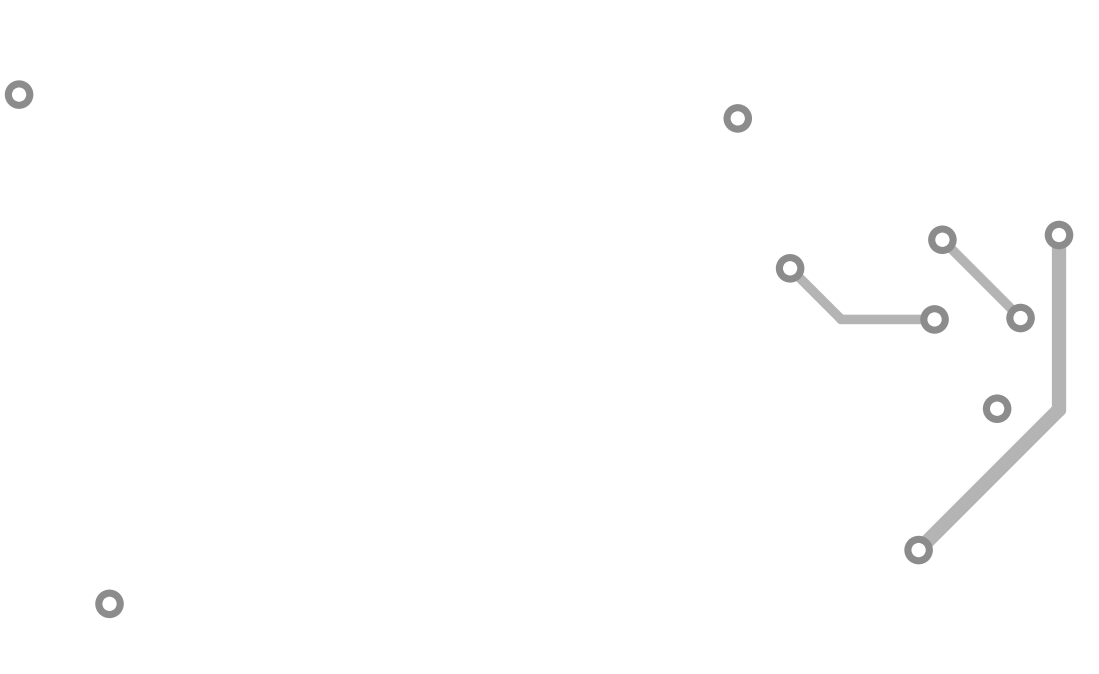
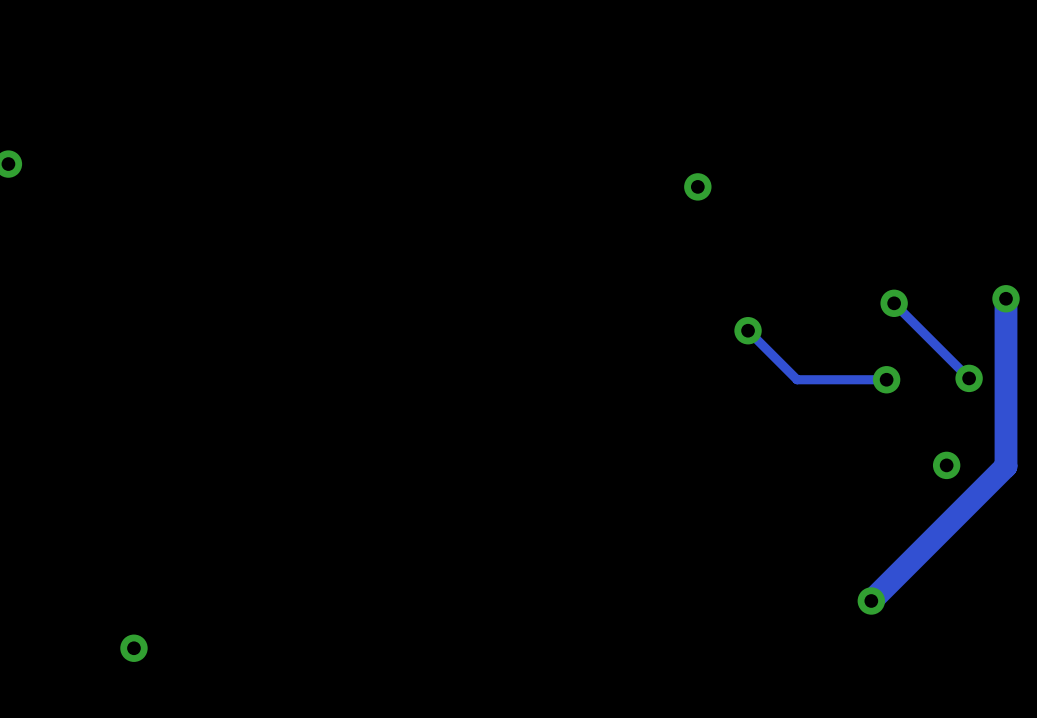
track width: thin (1059, 235) (1059, 409) (918, 550) -> thick (1006, 298) (1006, 466) (871, 600)
via position: (109, 603) -> (133, 648)

